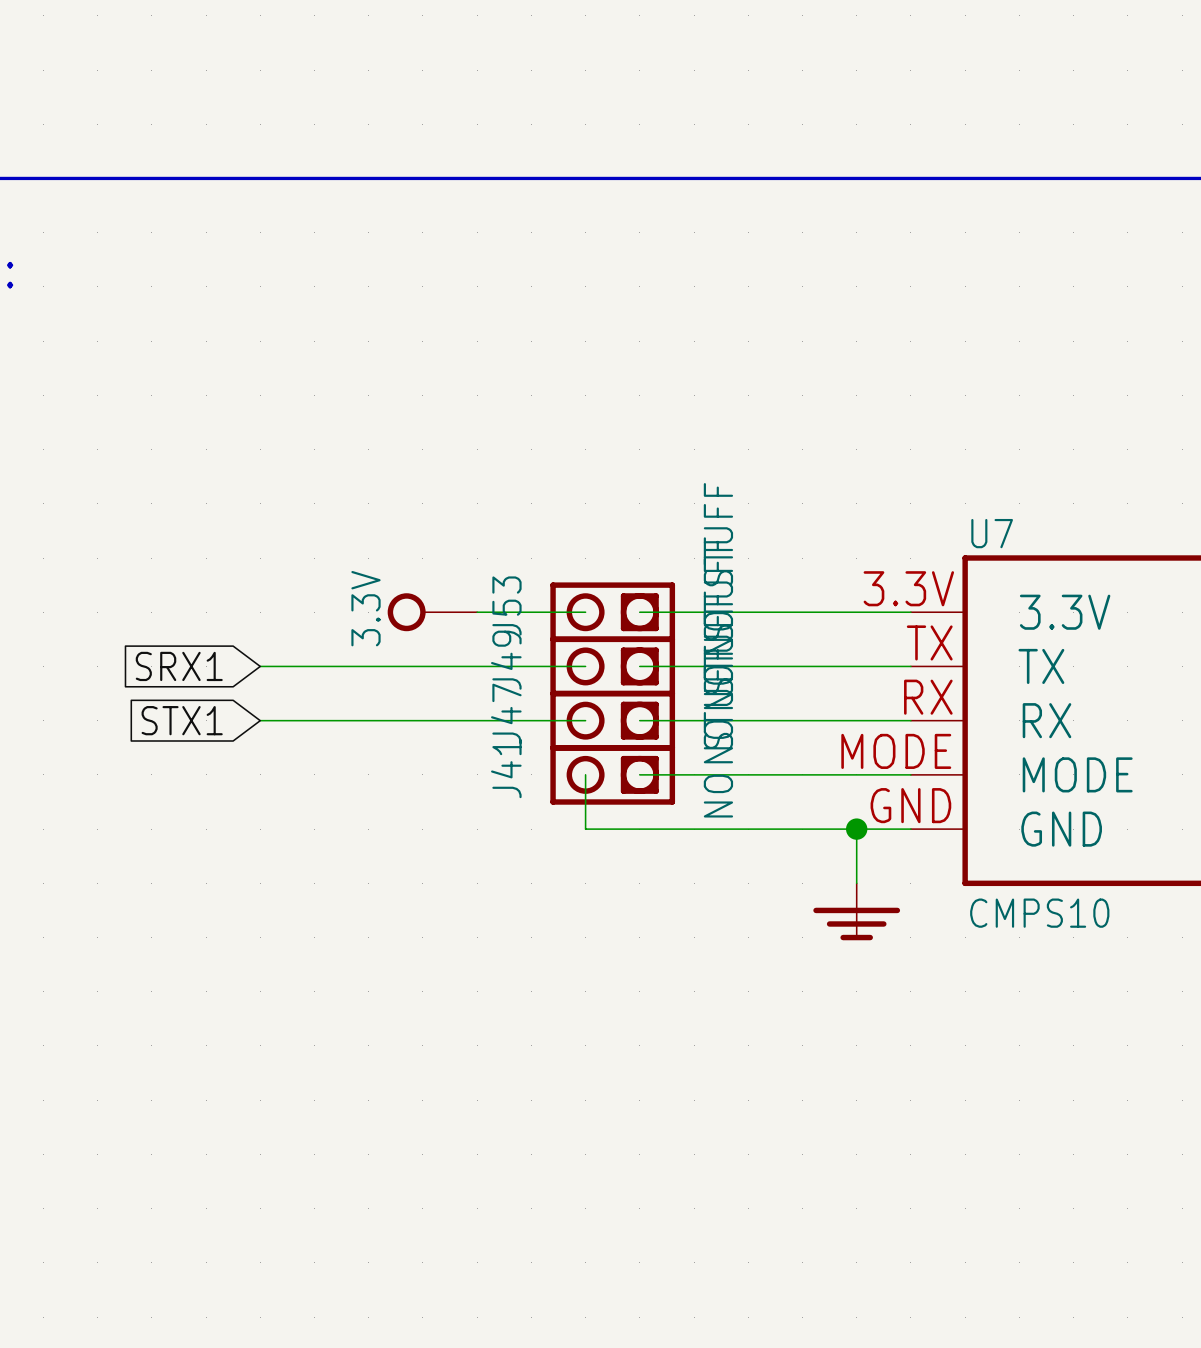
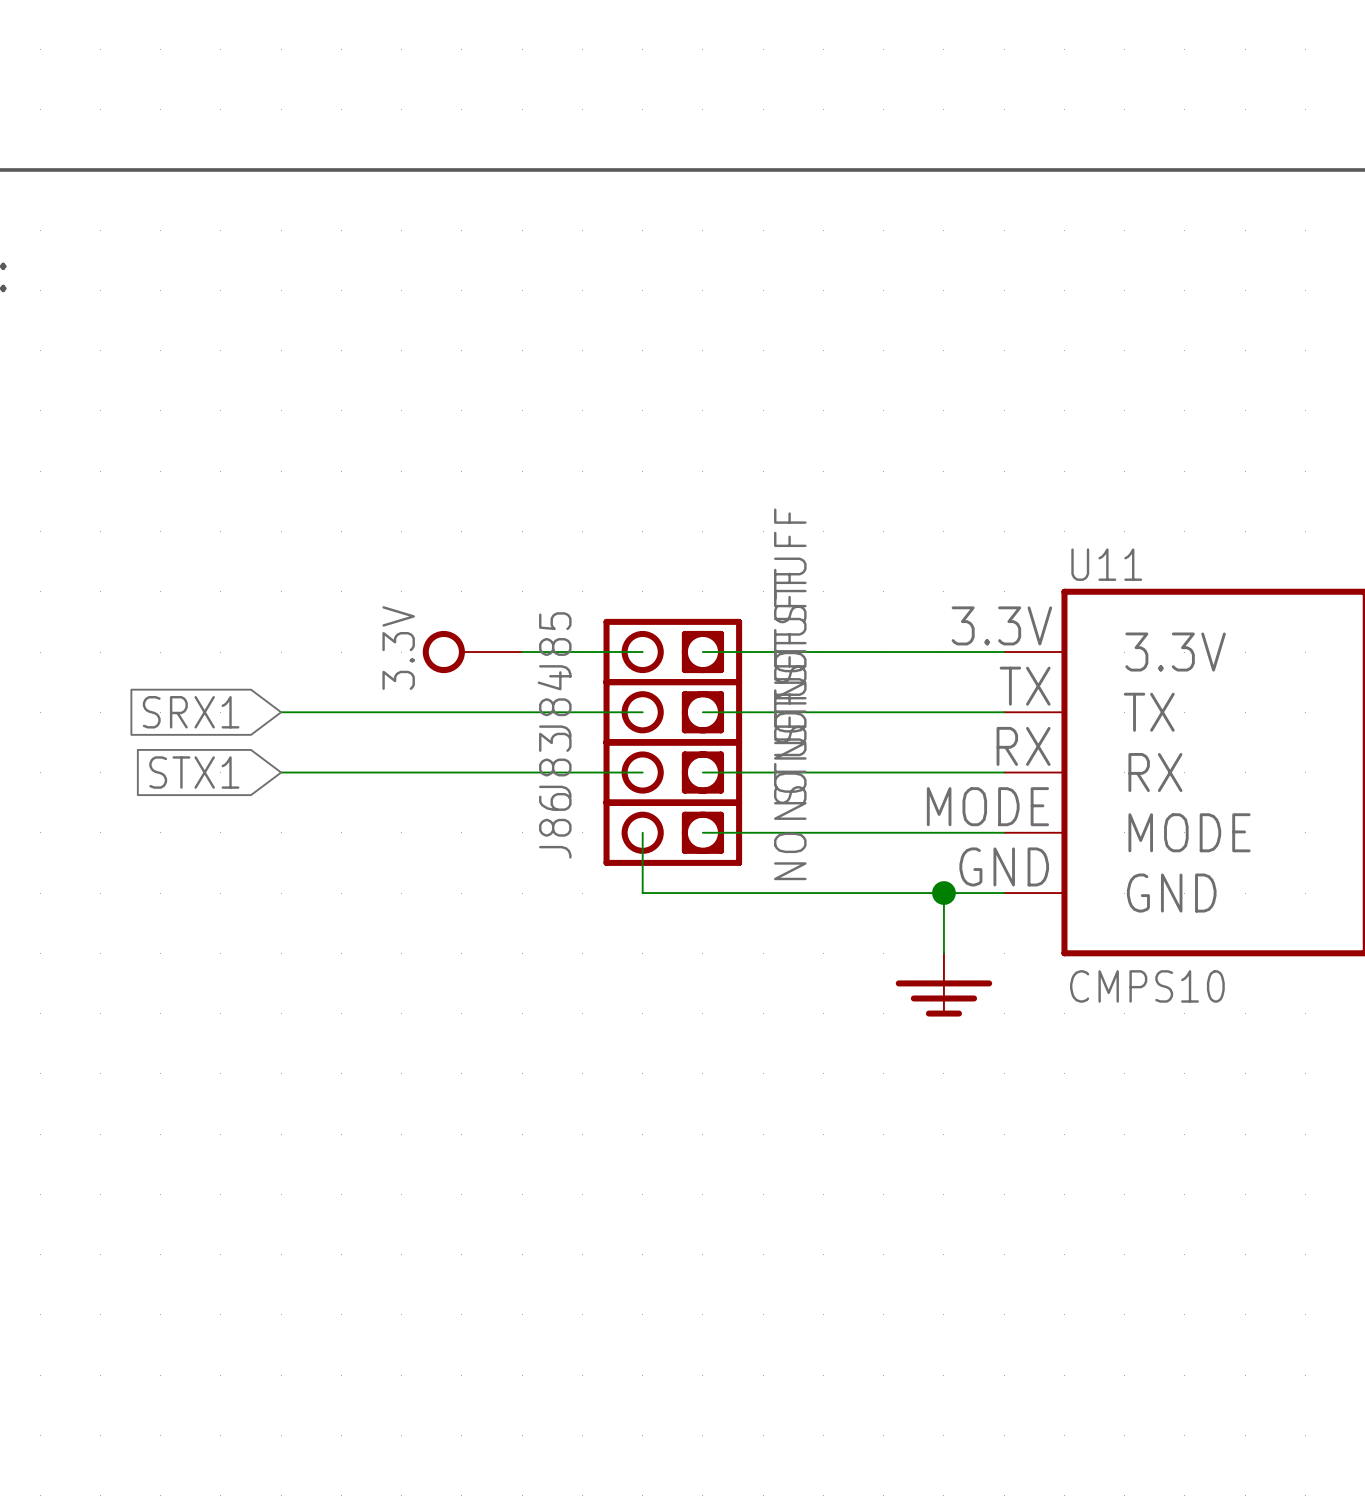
U7 name: U7 (992, 533) -> U11 (1106, 564)
J53 name: J53 (506, 605) -> J85 (555, 645)
J49 name: J49 (506, 660) -> J84 (554, 704)
J47 name: J47 (506, 713) -> J83 (555, 765)
J41 name: J41 (506, 768) -> J86 (555, 825)

